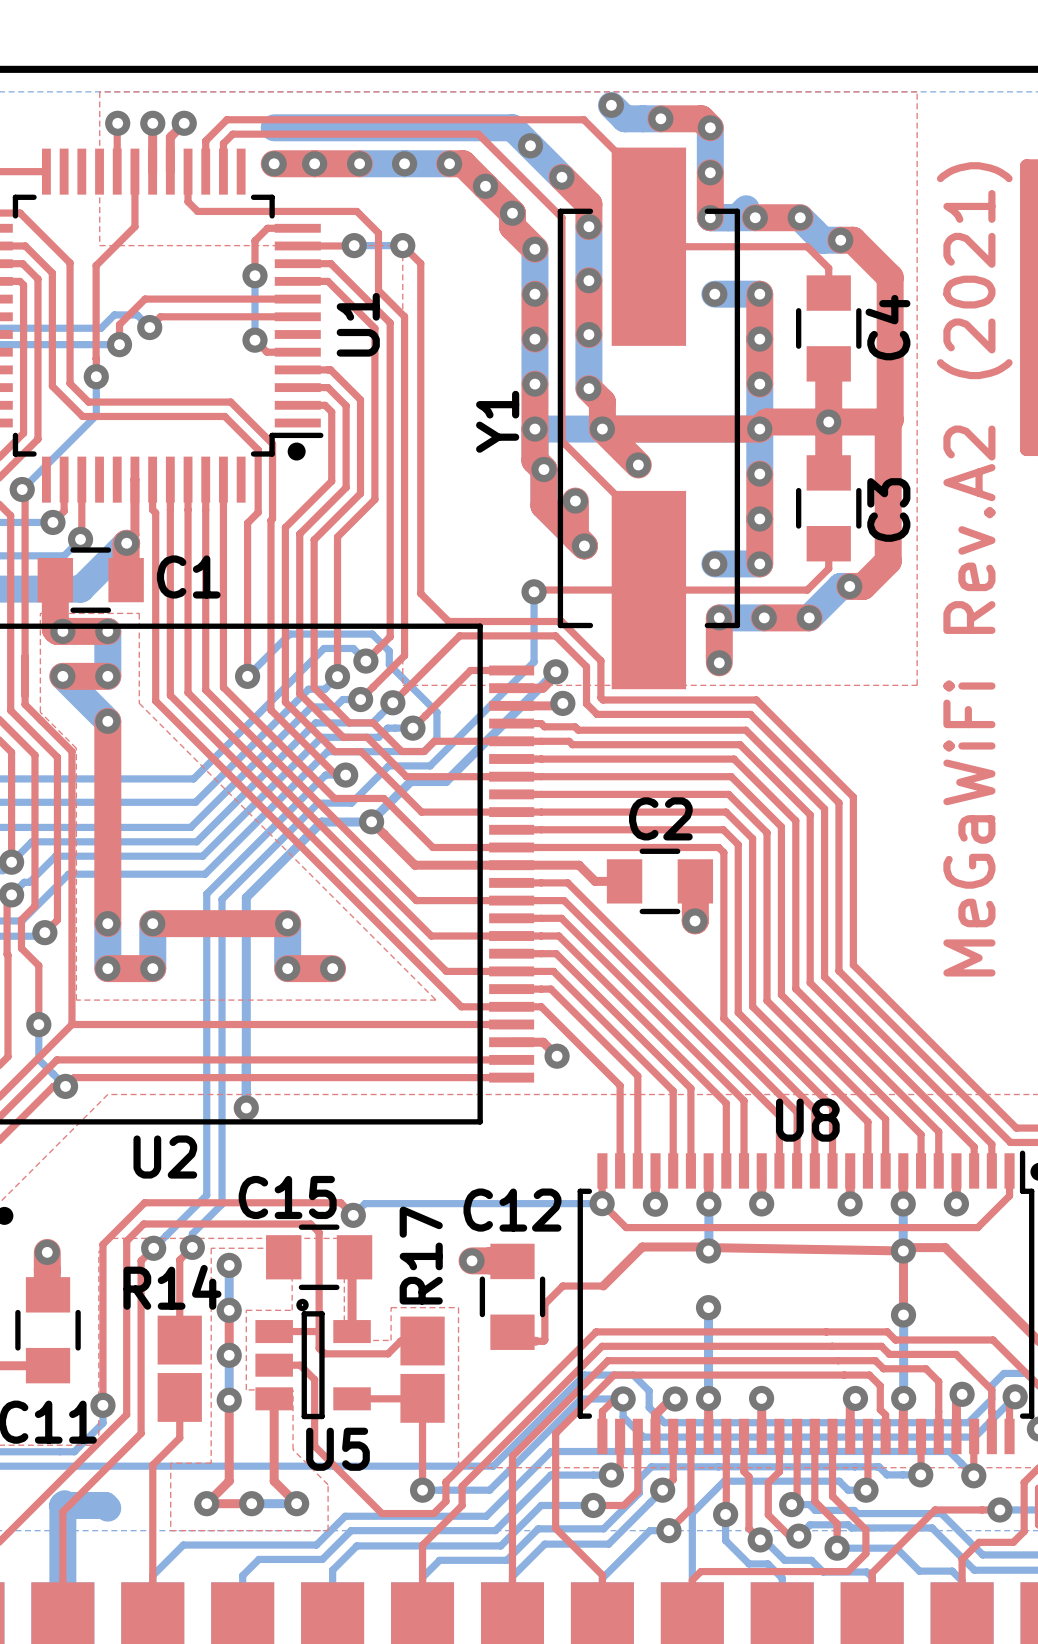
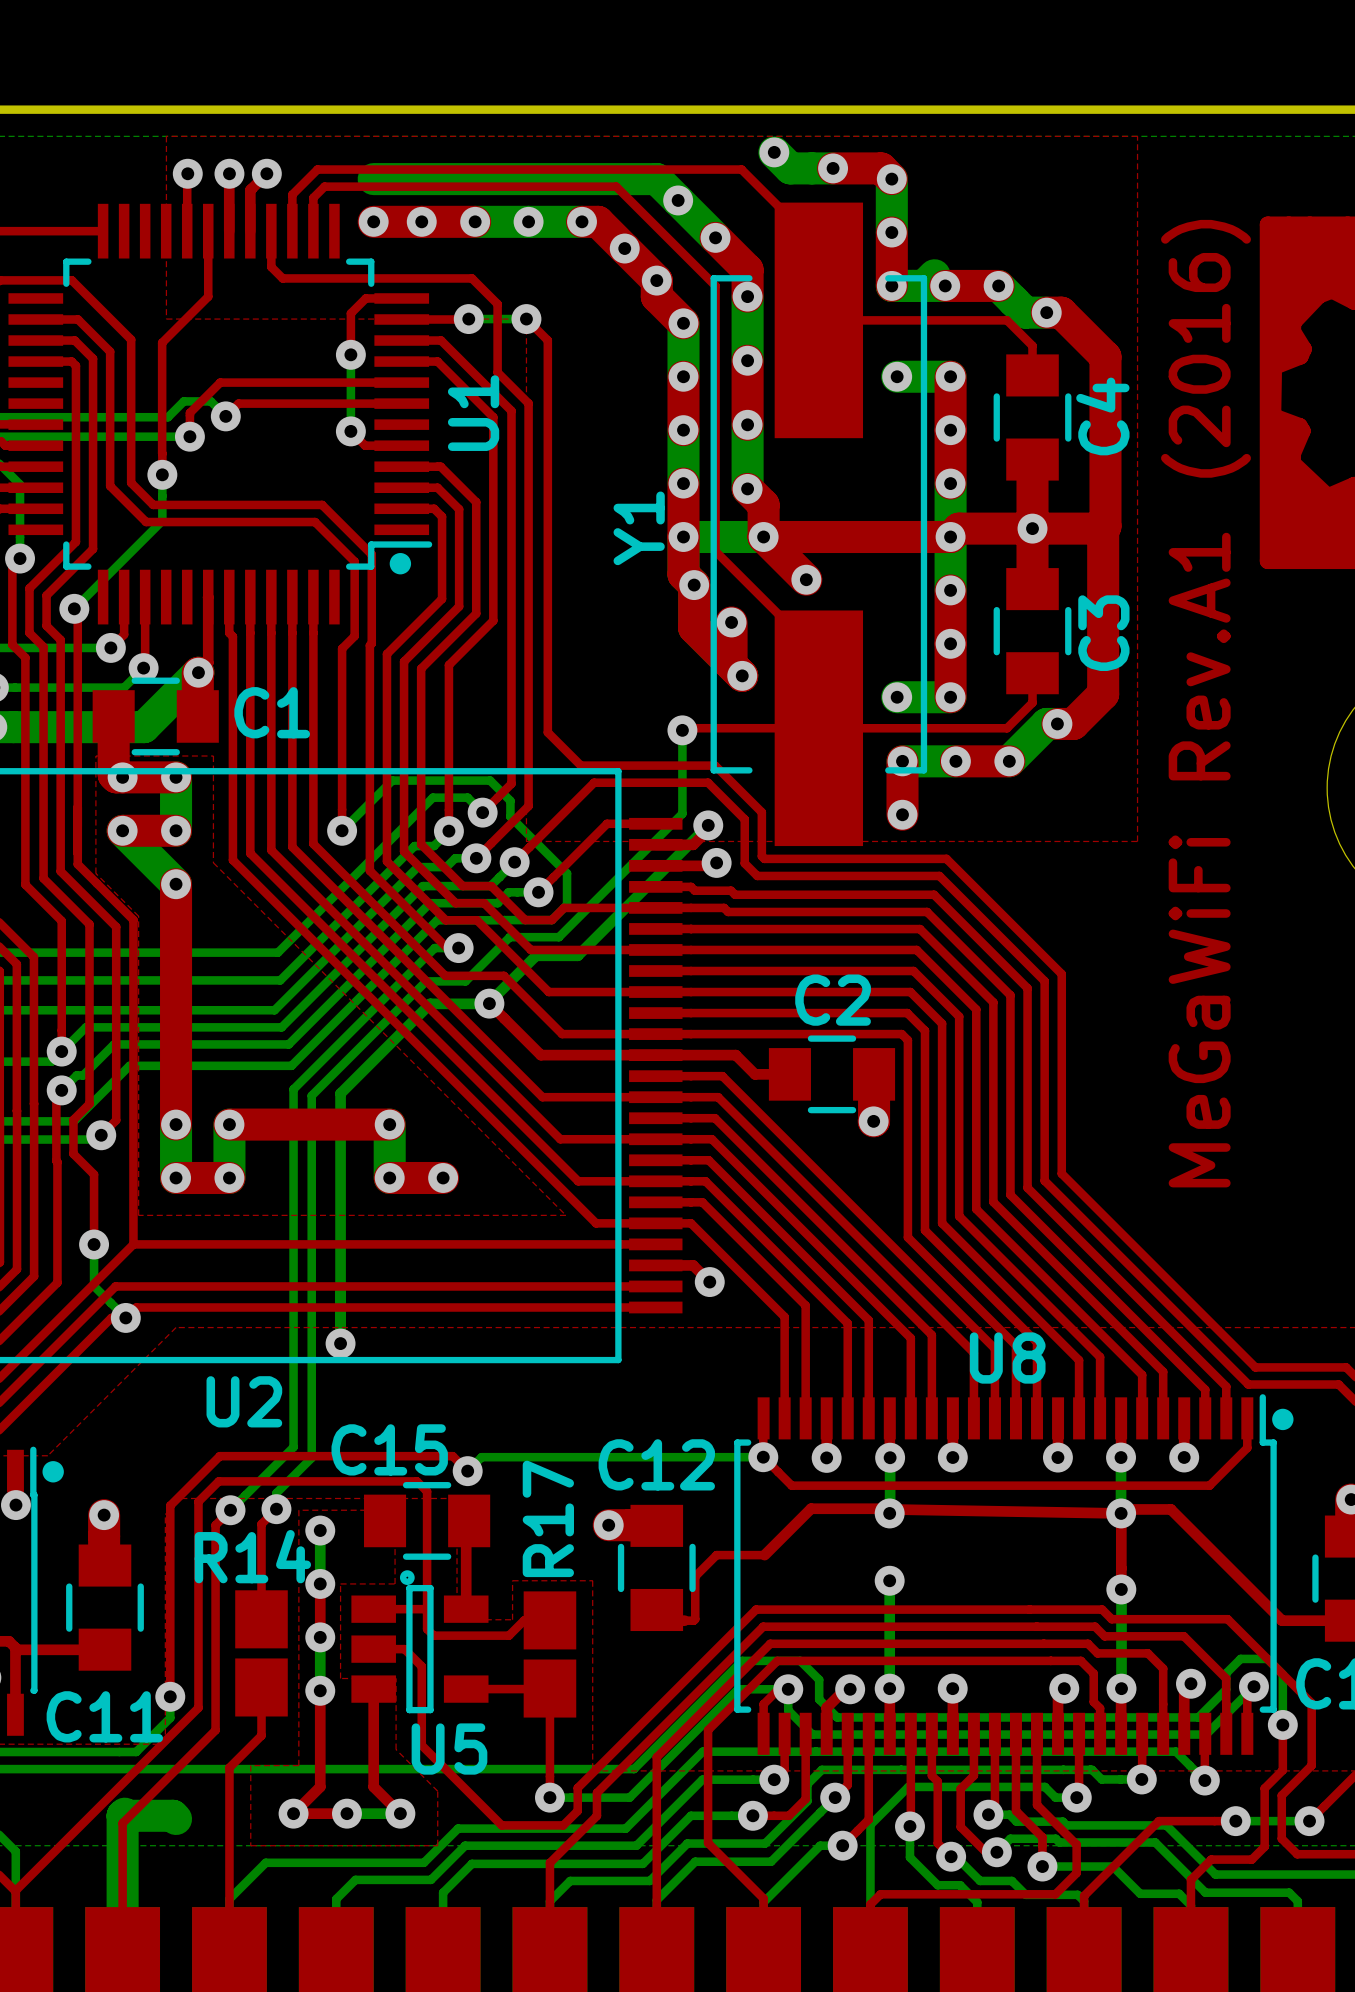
text: MeGaWiFi Rev.A2 (2021) (974, 569) -> MeGaWiFi Rev.A1 (2016) (1206, 703)

